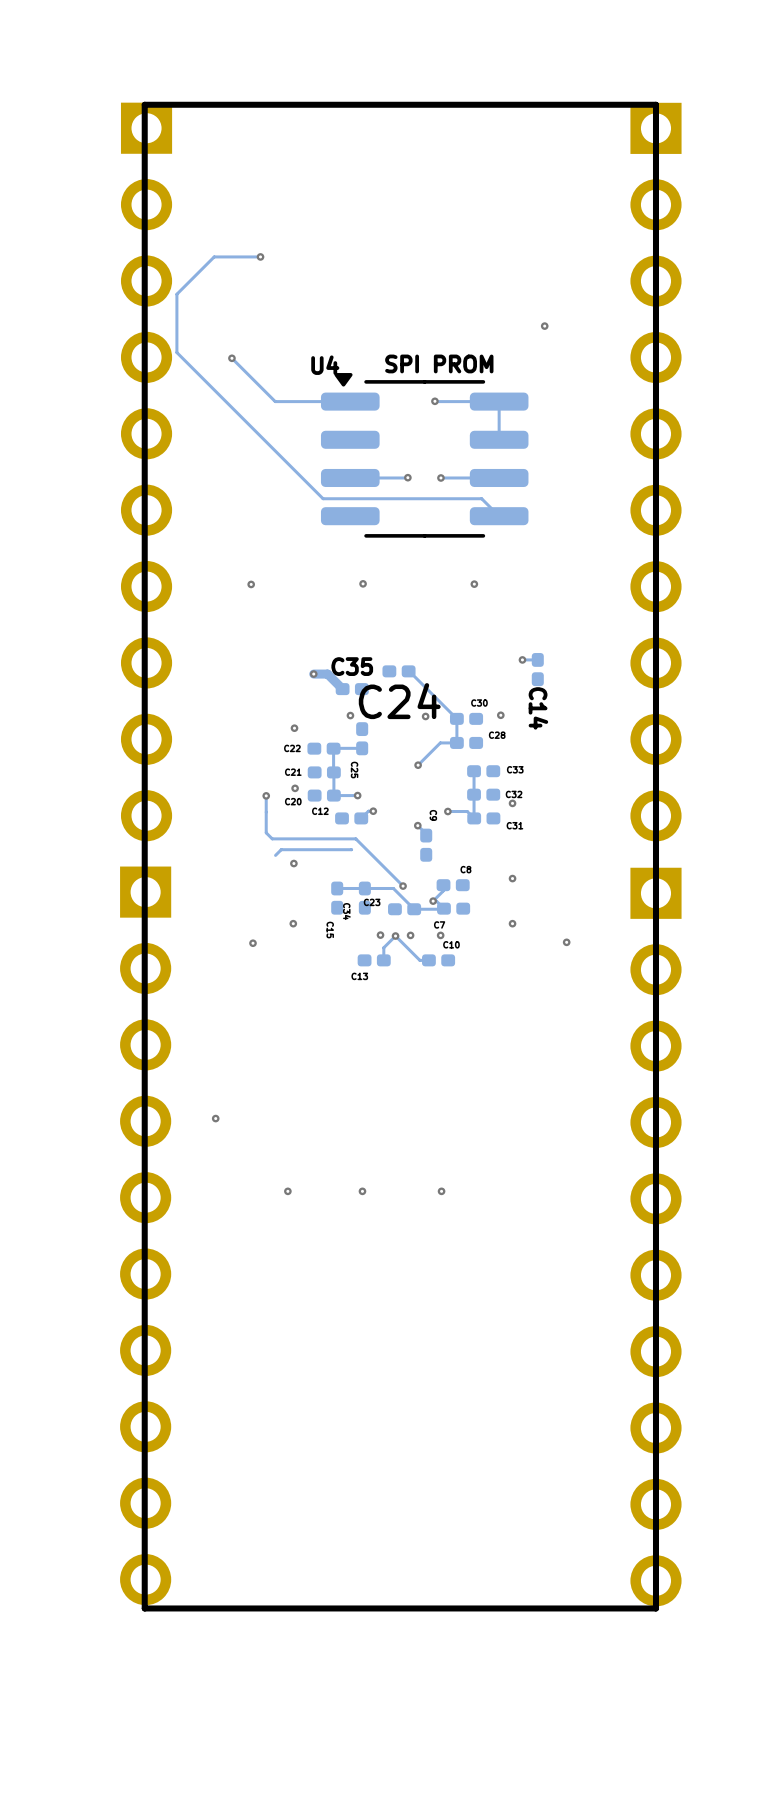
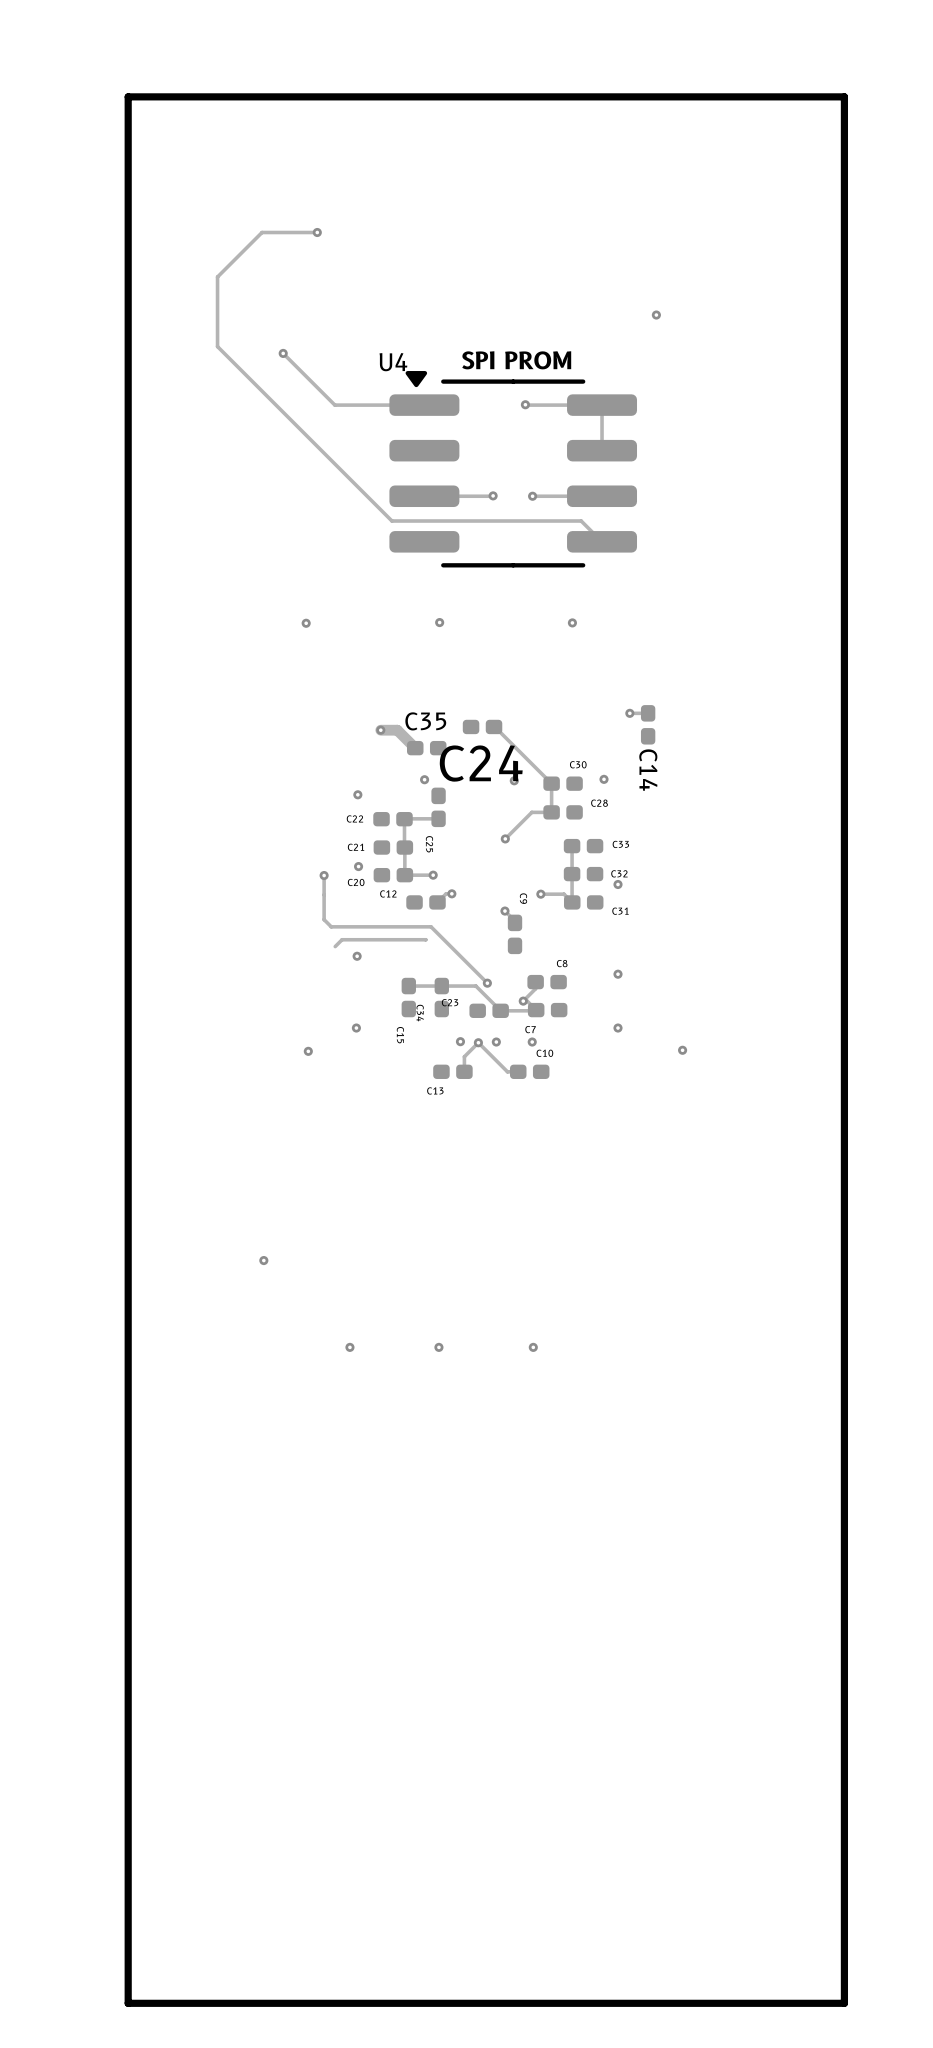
board edge: (655, 104) (144, 104) (144, 1608) (655, 1608) (655, 104) -> (844, 96) (844, 2003) (128, 2003) (128, 96) (844, 96)
part: (146, 471) -> none
part: (655, 472) -> none
part: (145, 1235) -> none
part: (655, 1237) -> none

